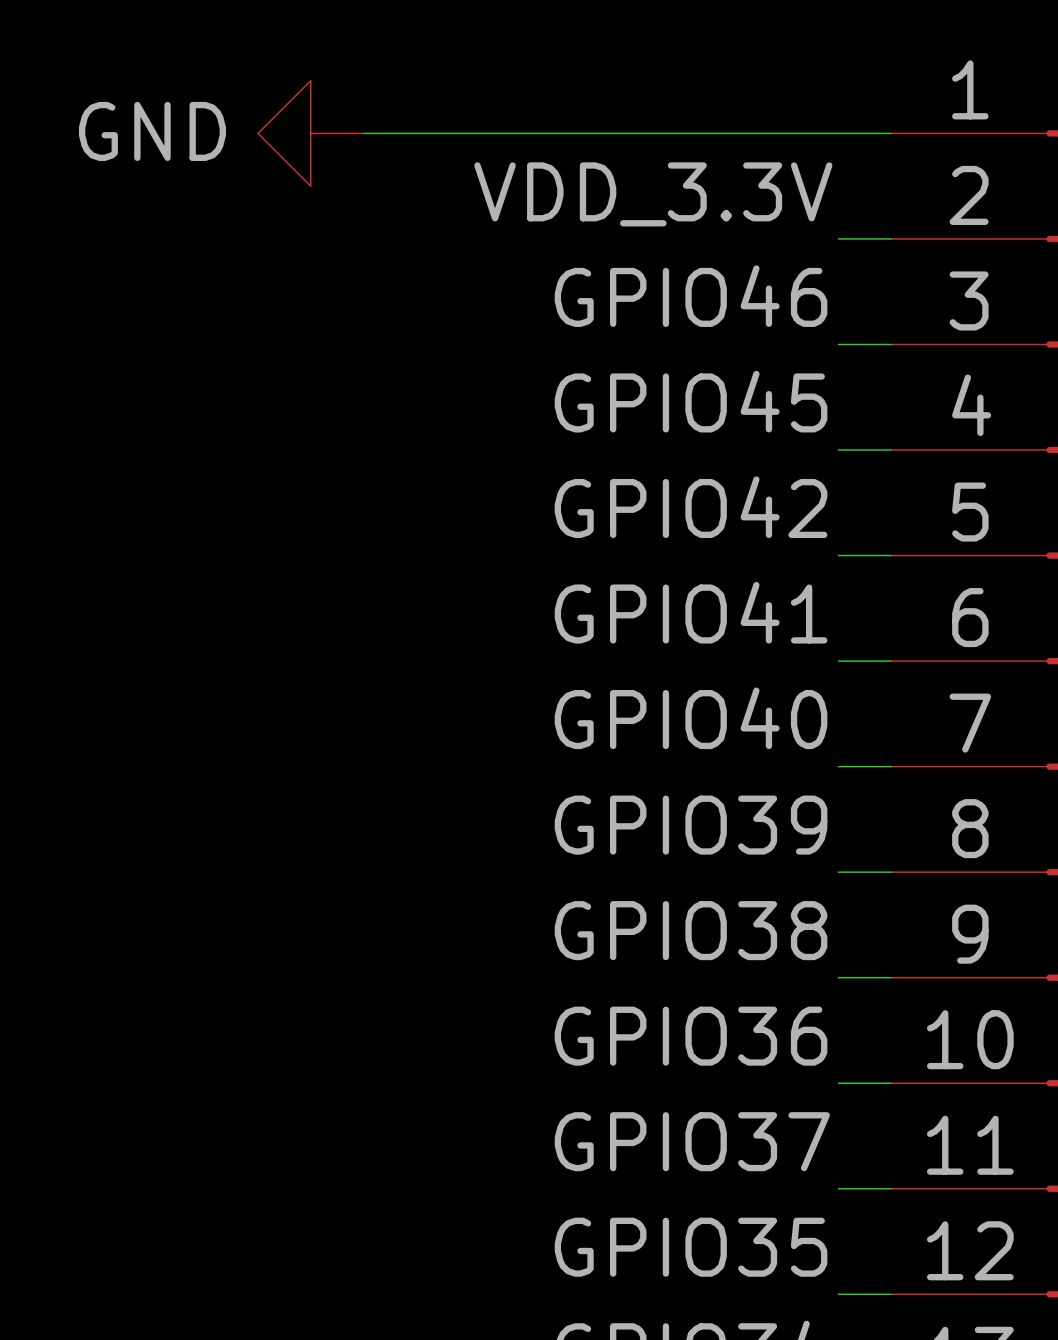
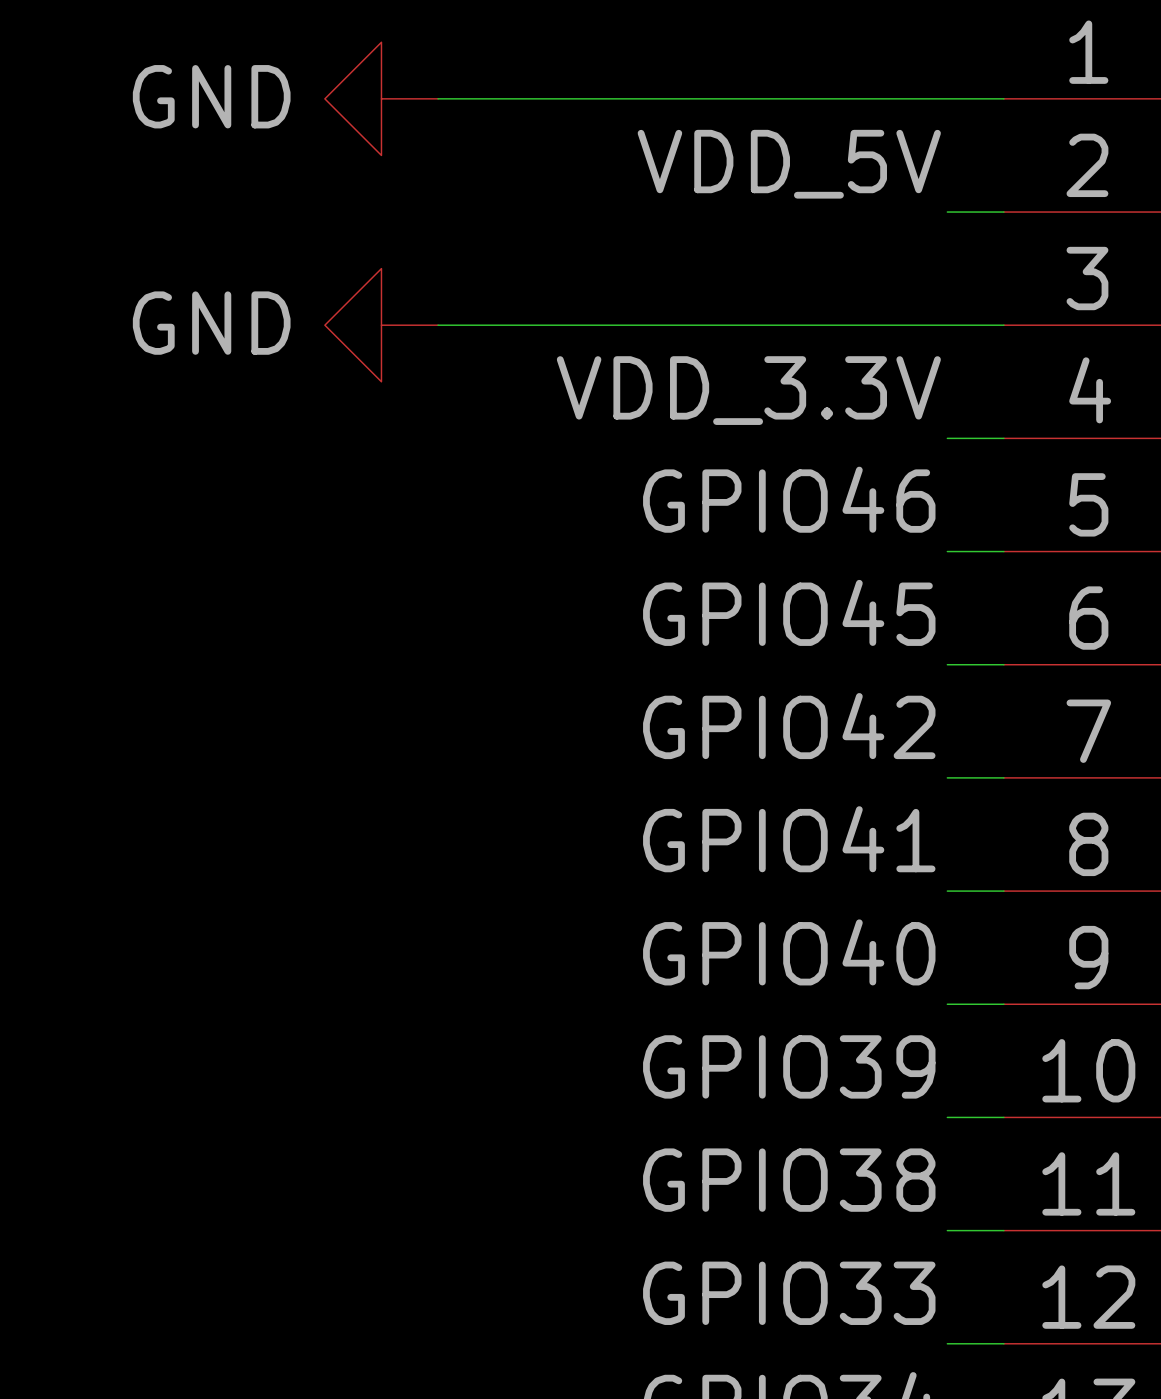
label: VDD_3.3V (653, 194) -> VDD_5V (789, 164)
label: GPIO46 (691, 296) -> none
power symbol: none -> GND (381, 325)
wire: none -> (438, 325) (947, 325)
label: GPIO45 (691, 401) -> VDD_3.3V (748, 390)
label: GPIO42 (691, 507) -> GPIO46 (789, 499)
label: GPIO41 (691, 612) -> GPIO45 (789, 612)
label: GPIO40 (691, 718) -> GPIO42 (789, 726)
label: GPIO39 (691, 825) -> GPIO41 (789, 839)
label: GPIO38 (691, 930) -> GPIO40 (789, 952)
label: GPIO36 (691, 1036) -> GPIO39 (789, 1066)
label: GPIO37 (692, 1141) -> GPIO38 (789, 1180)
label: GPIO35 (691, 1247) -> GPIO33 (789, 1293)

